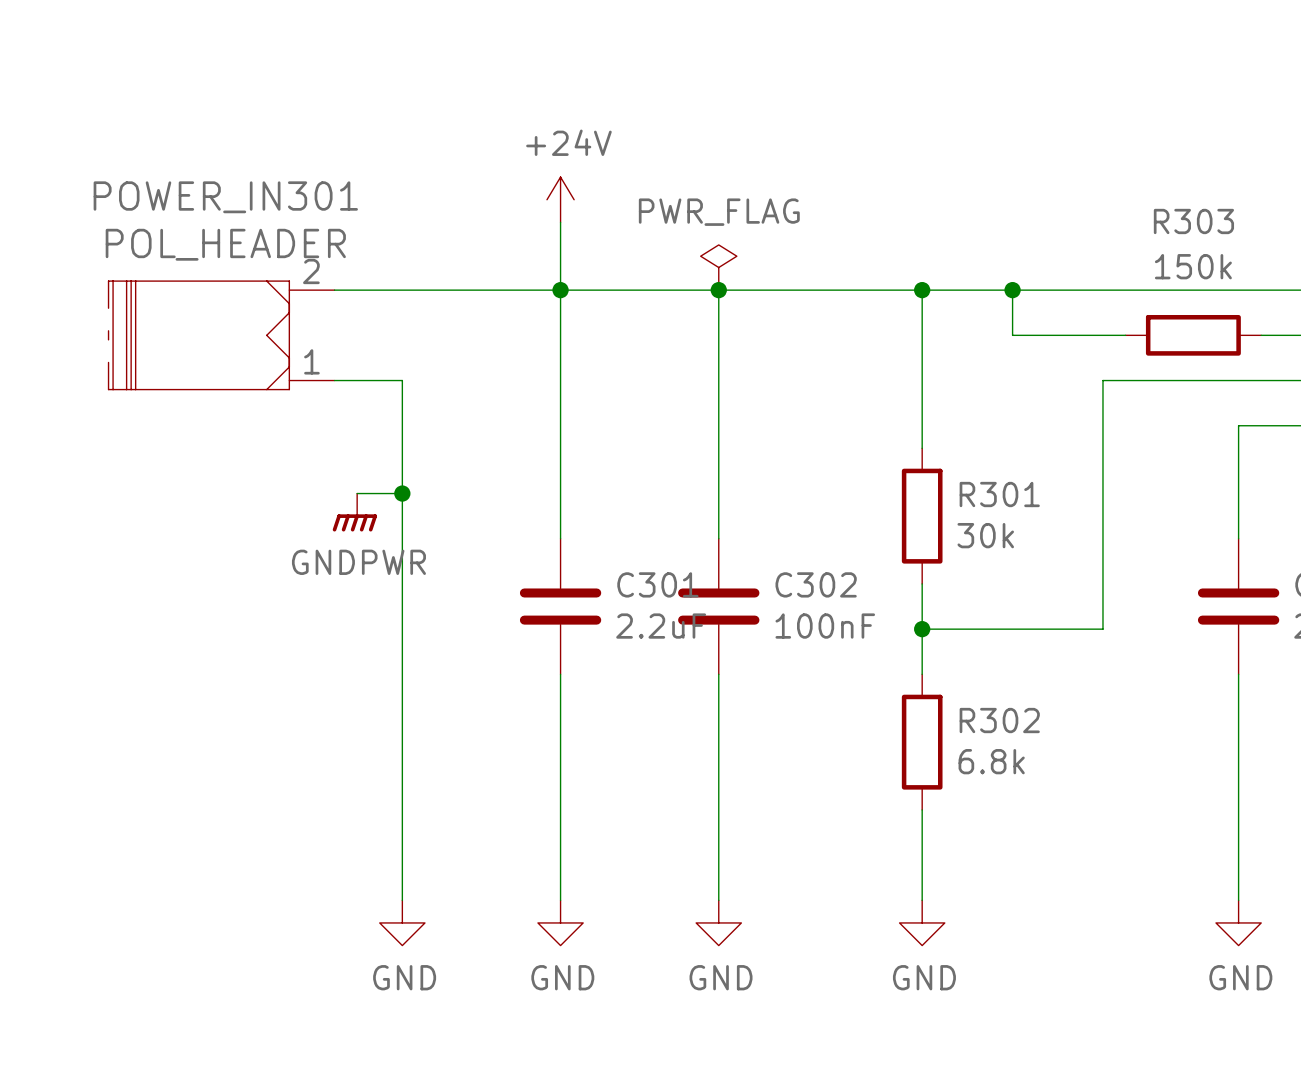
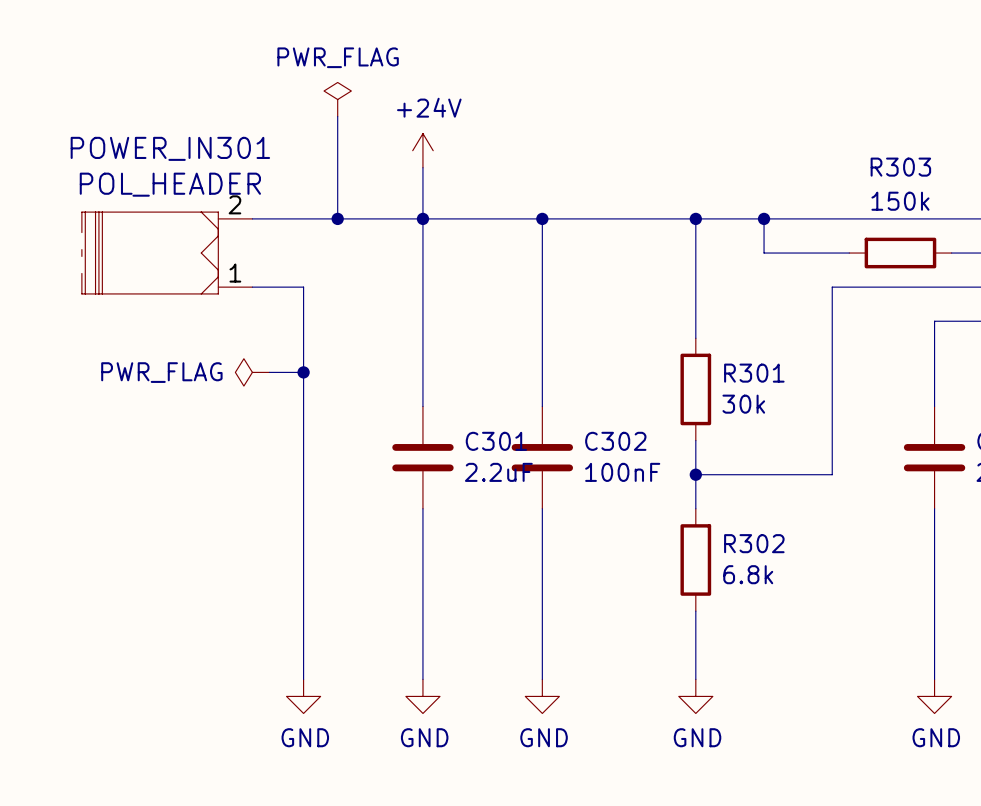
power symbol: none -> PWR_FLAG (337, 99)
wire: none -> (337, 116) (337, 218)
power symbol: PWR_FLAG (718, 267) -> none
junction: none -> (337, 218)
power symbol: none -> PWR_FLAG (252, 372)
power symbol: GNDPWR (354, 512) -> none

